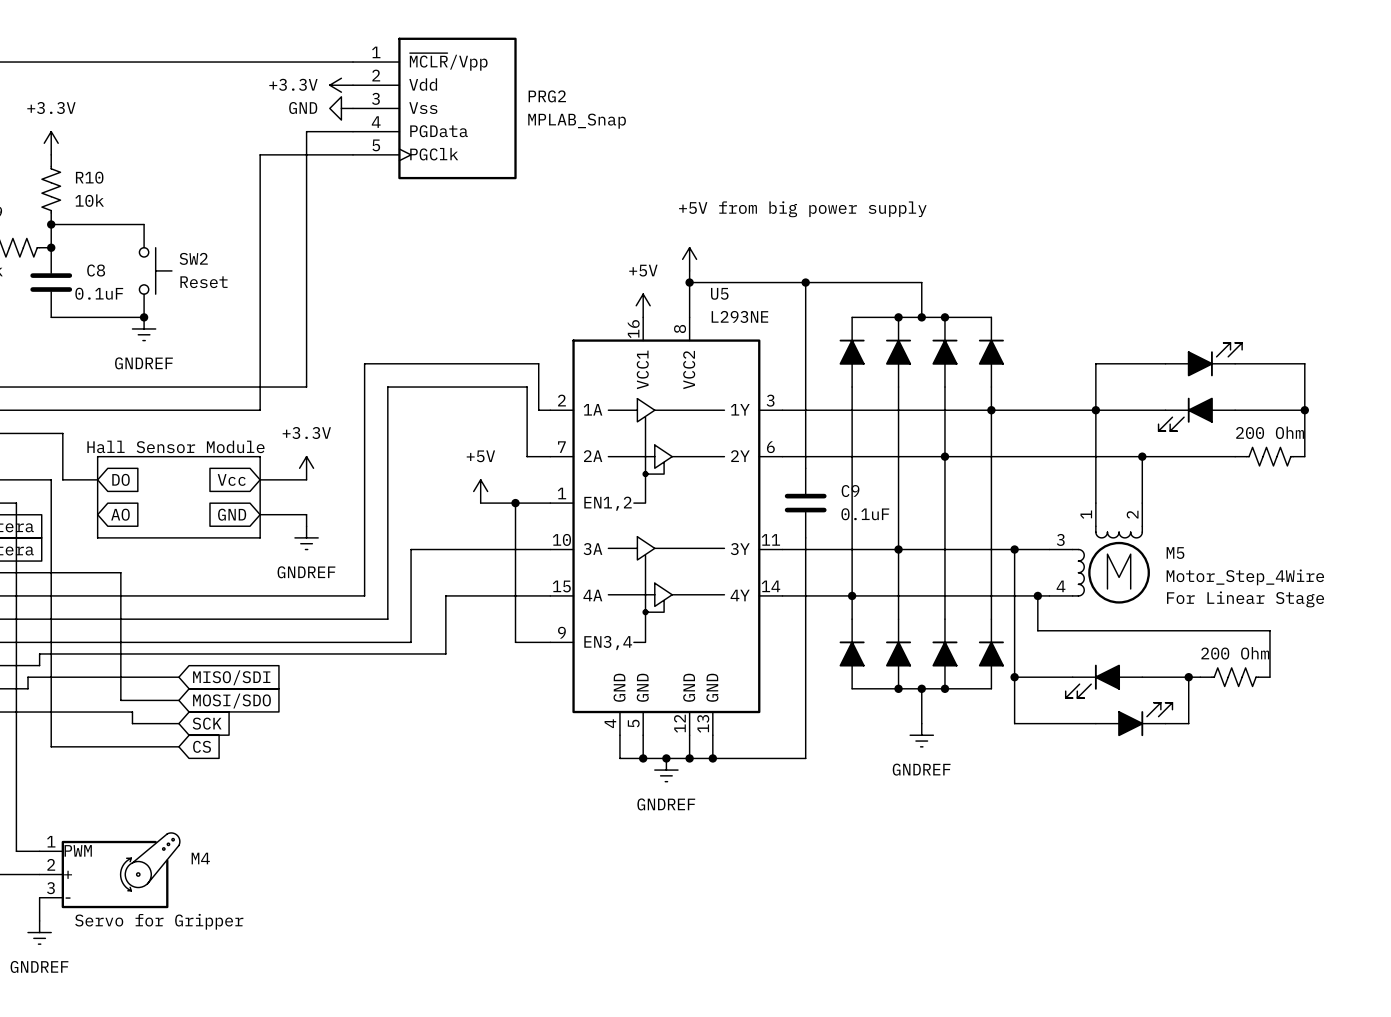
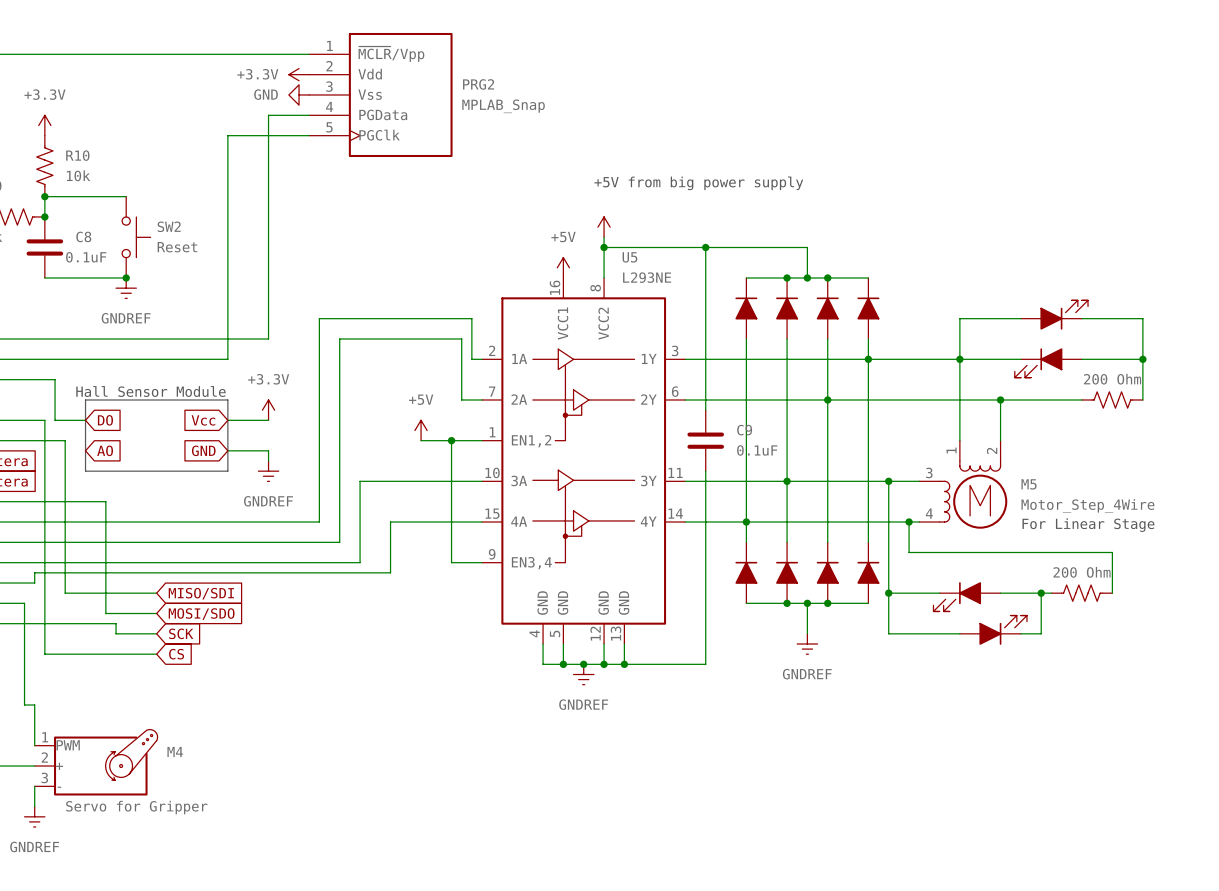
wire: (16, 503) (16, 851) (39, 851) -> (14, 440) (65, 440) (65, 593)
wire: (74, 677) (28, 677) (28, 688) -> (34, 745) (34, 705) (24, 705) (24, 603)

